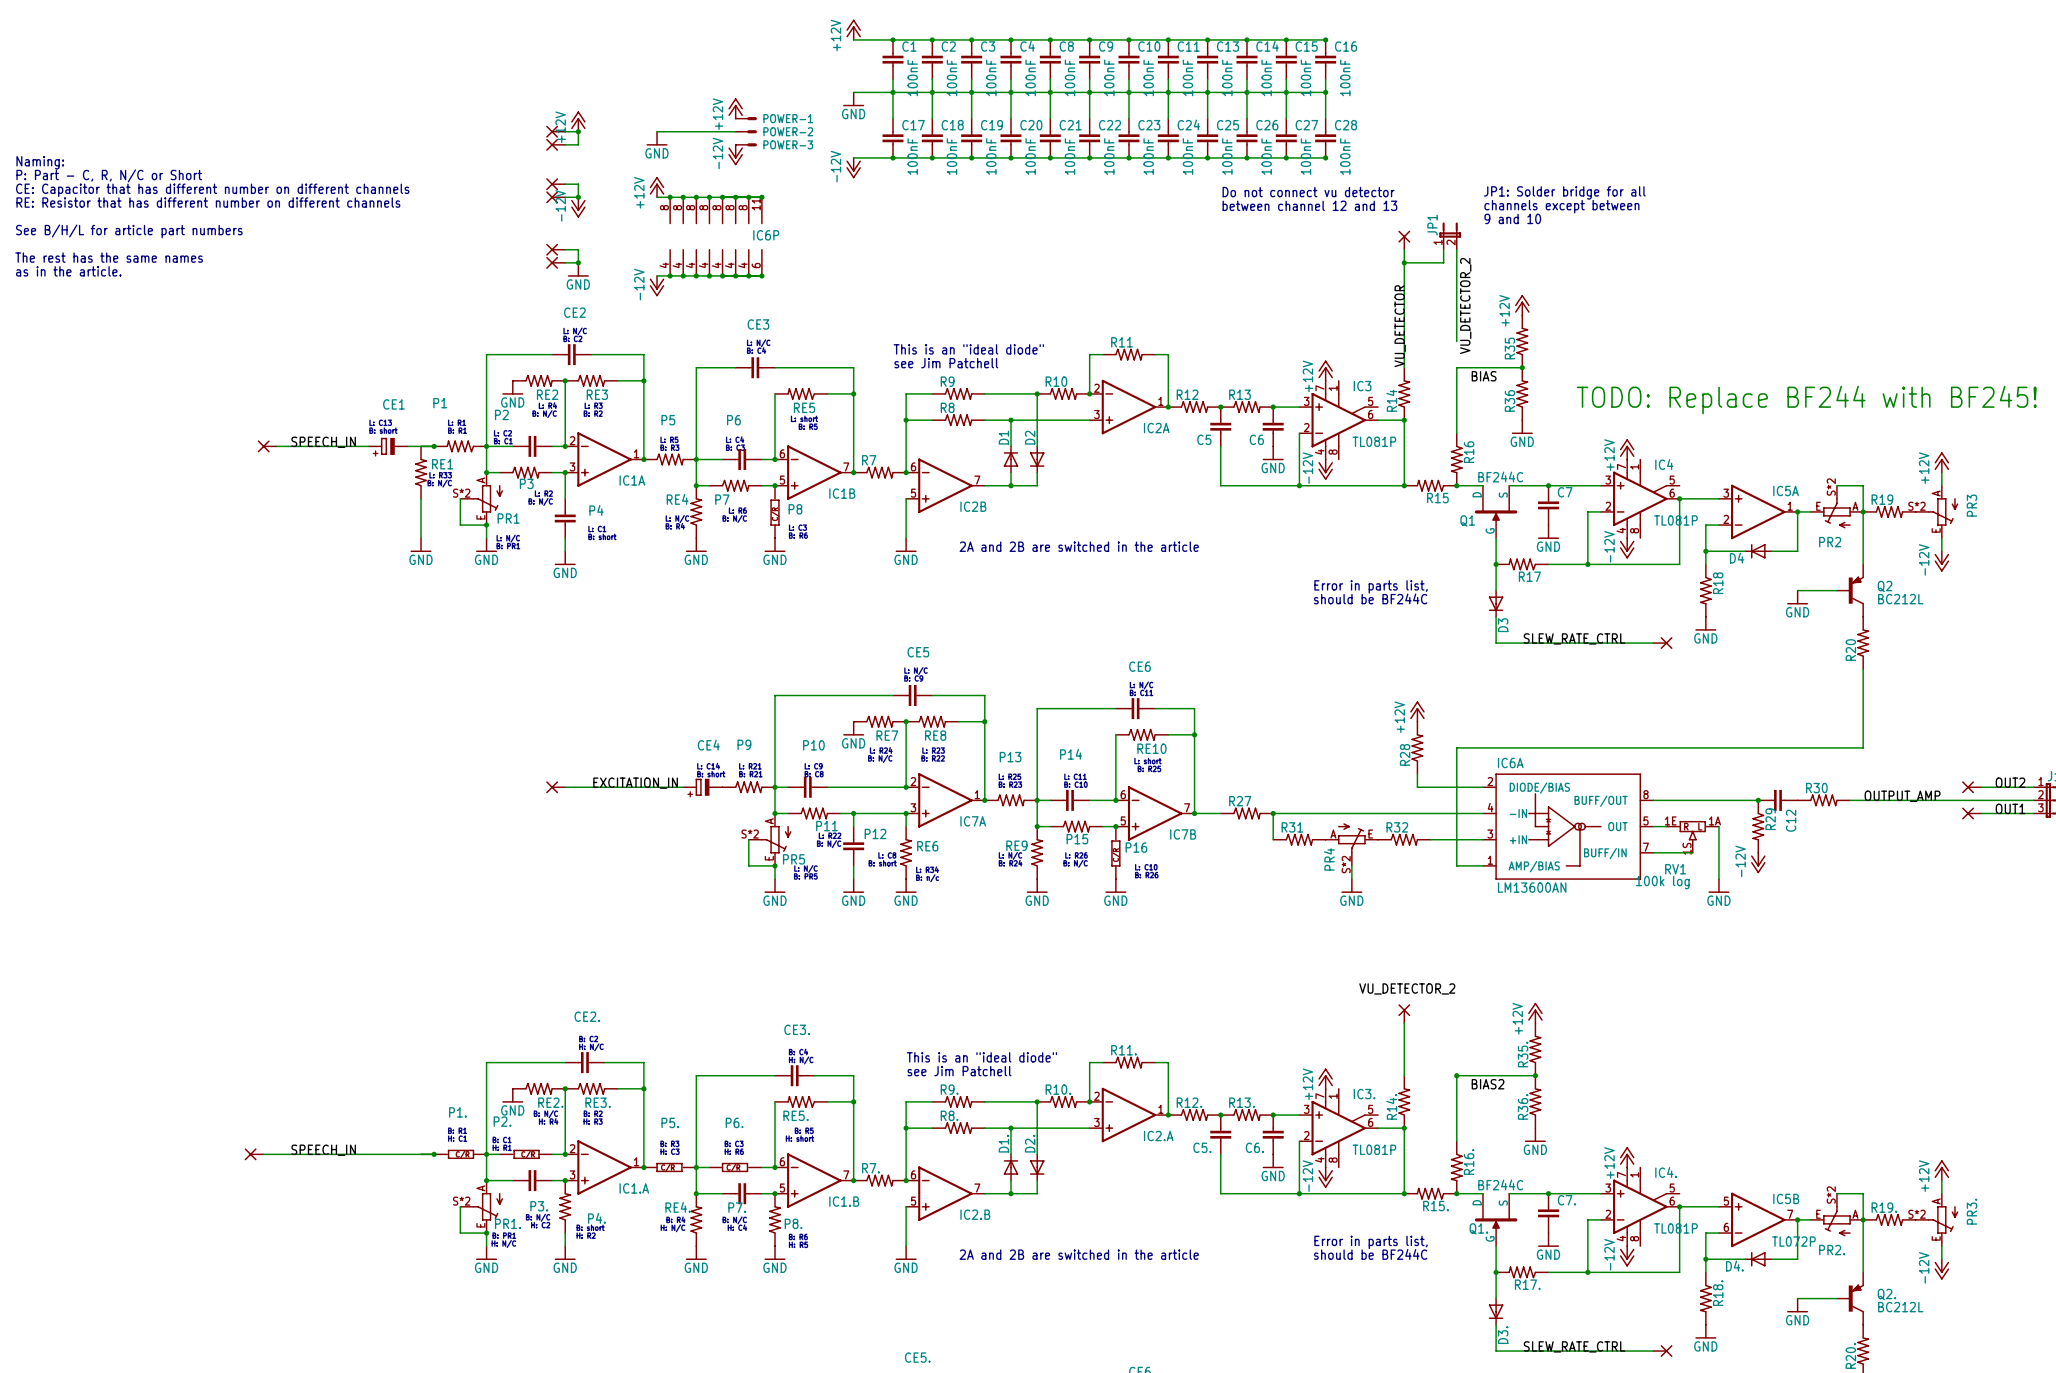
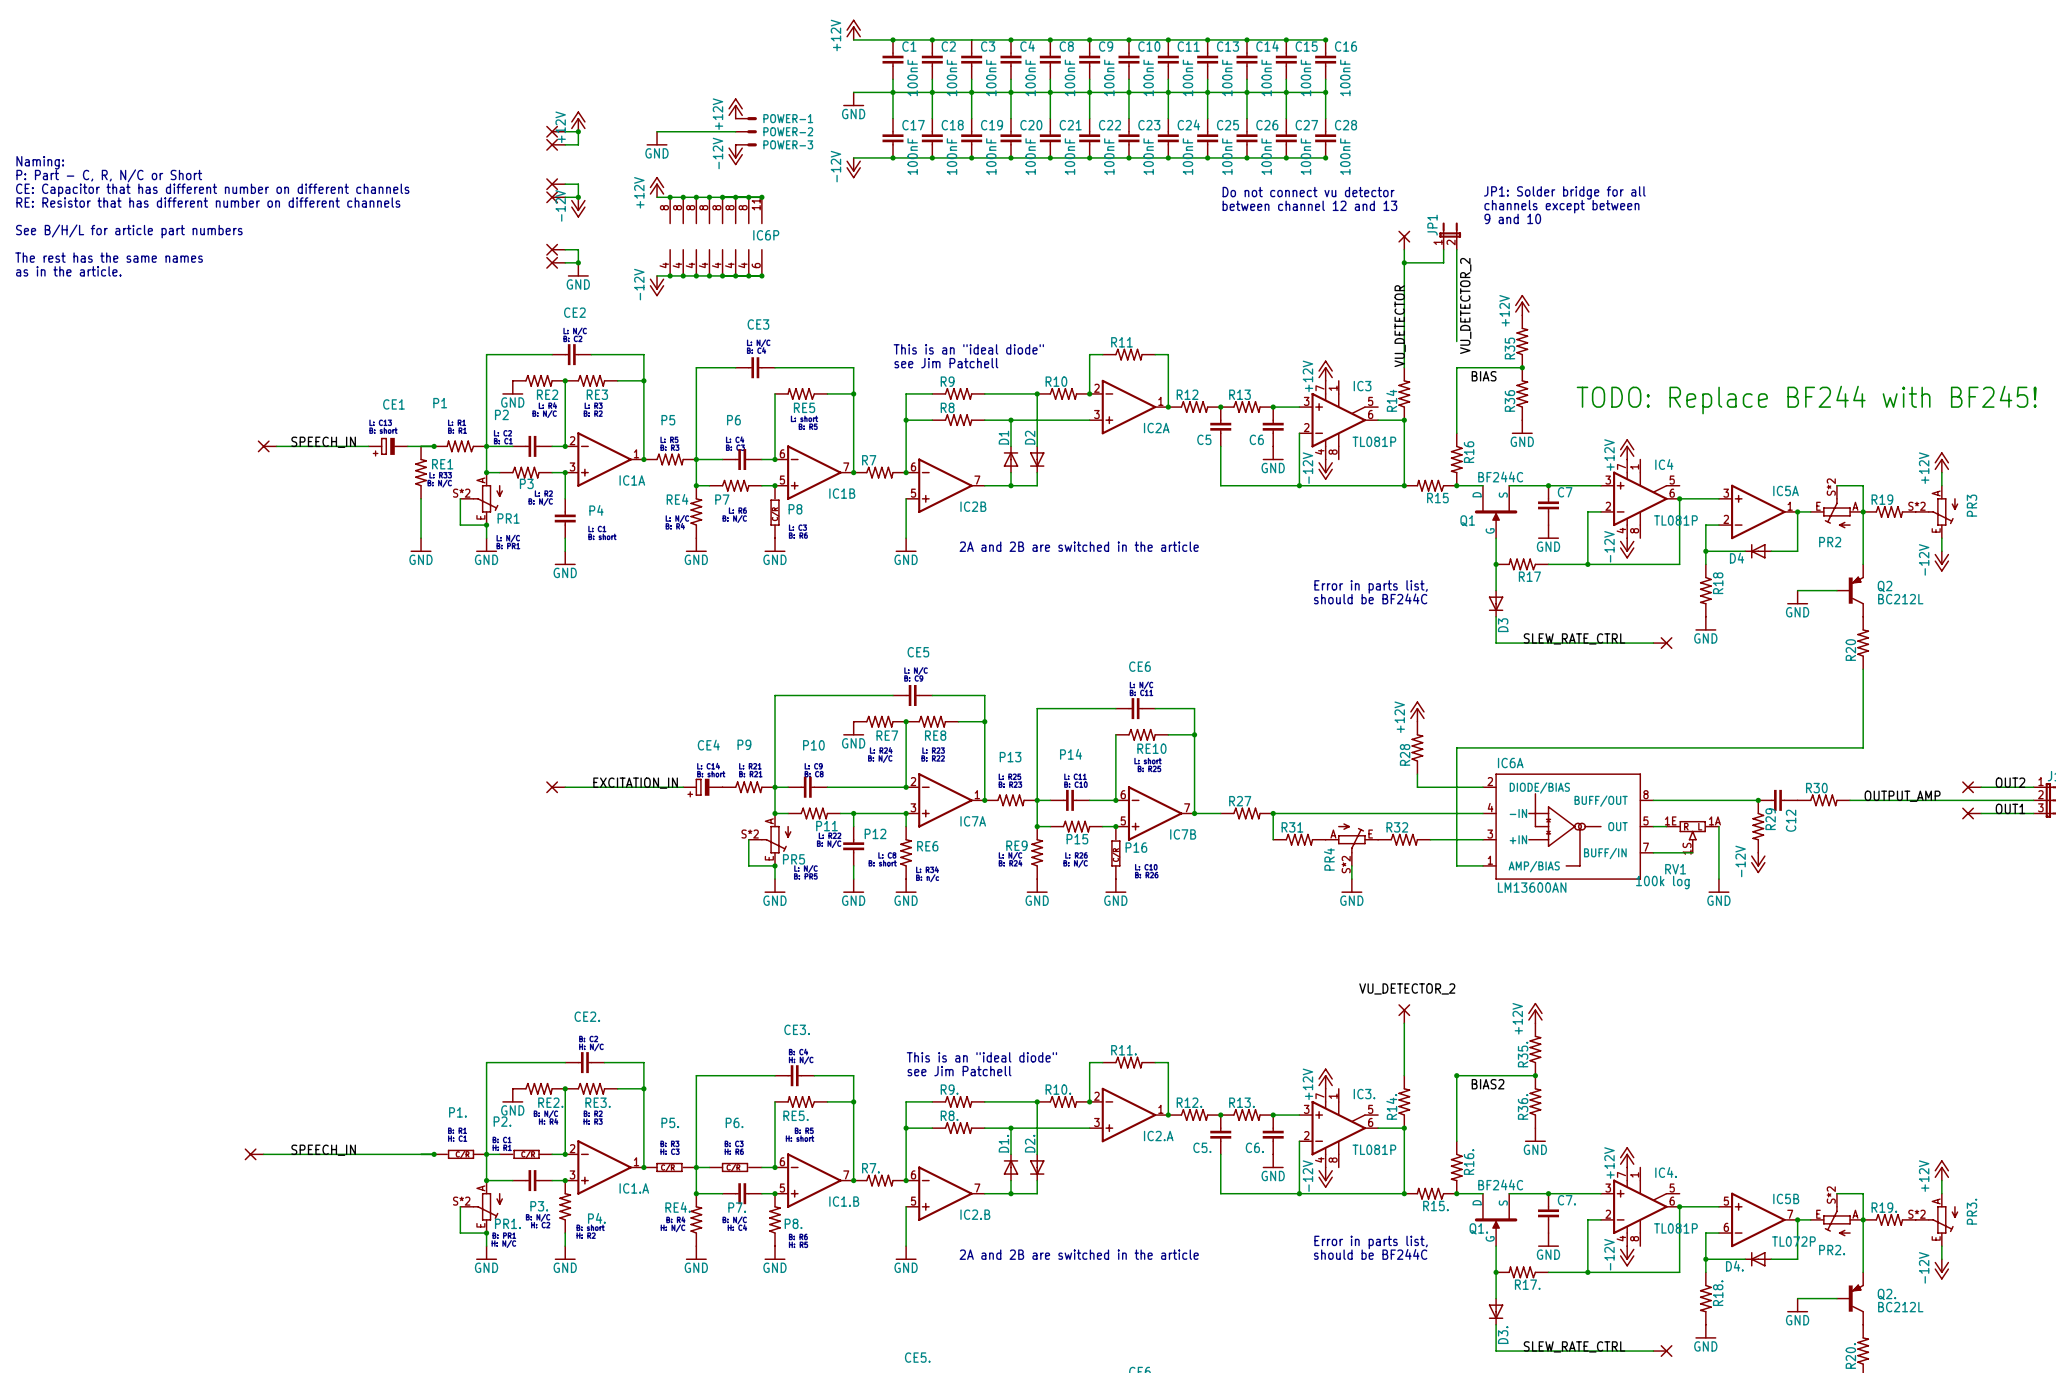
junction: (971, 39) -> none

